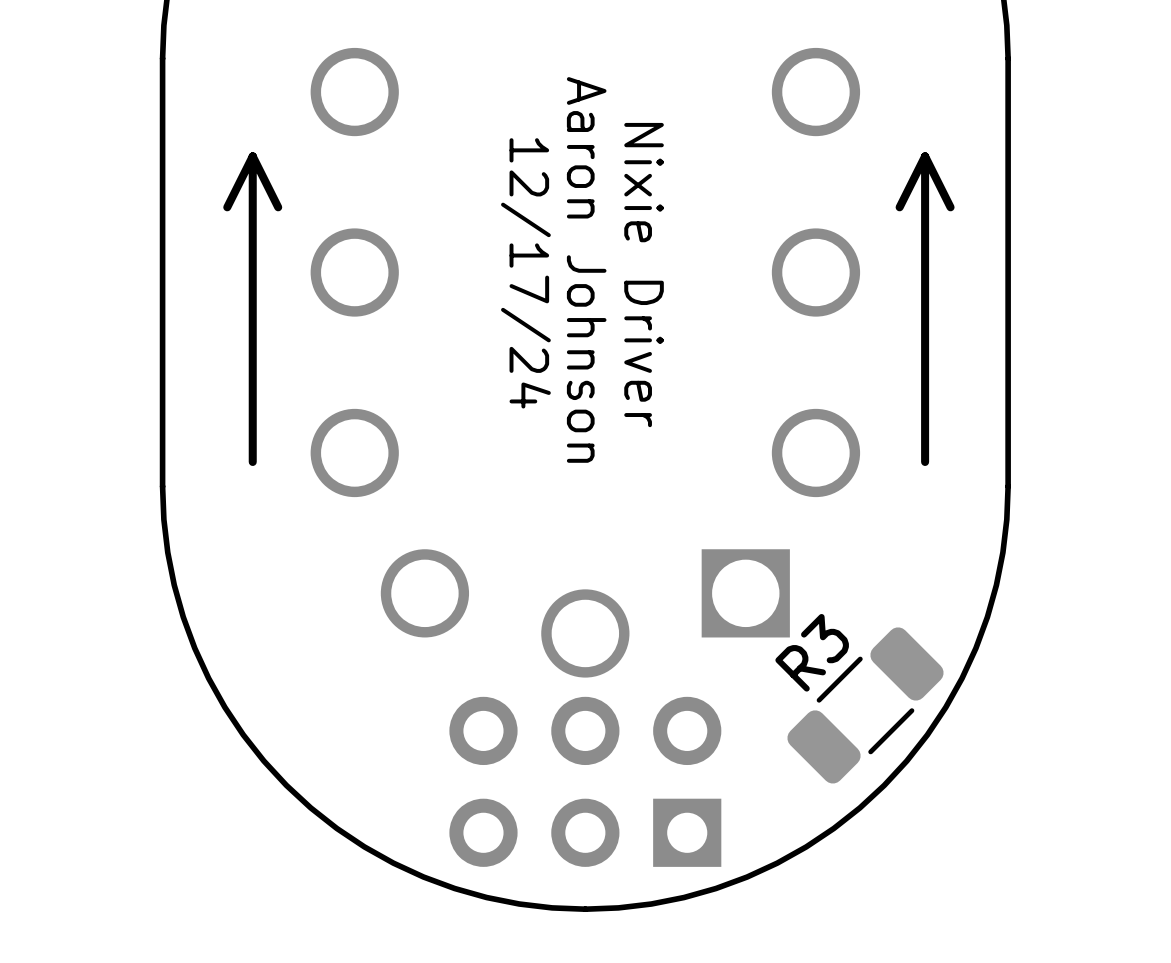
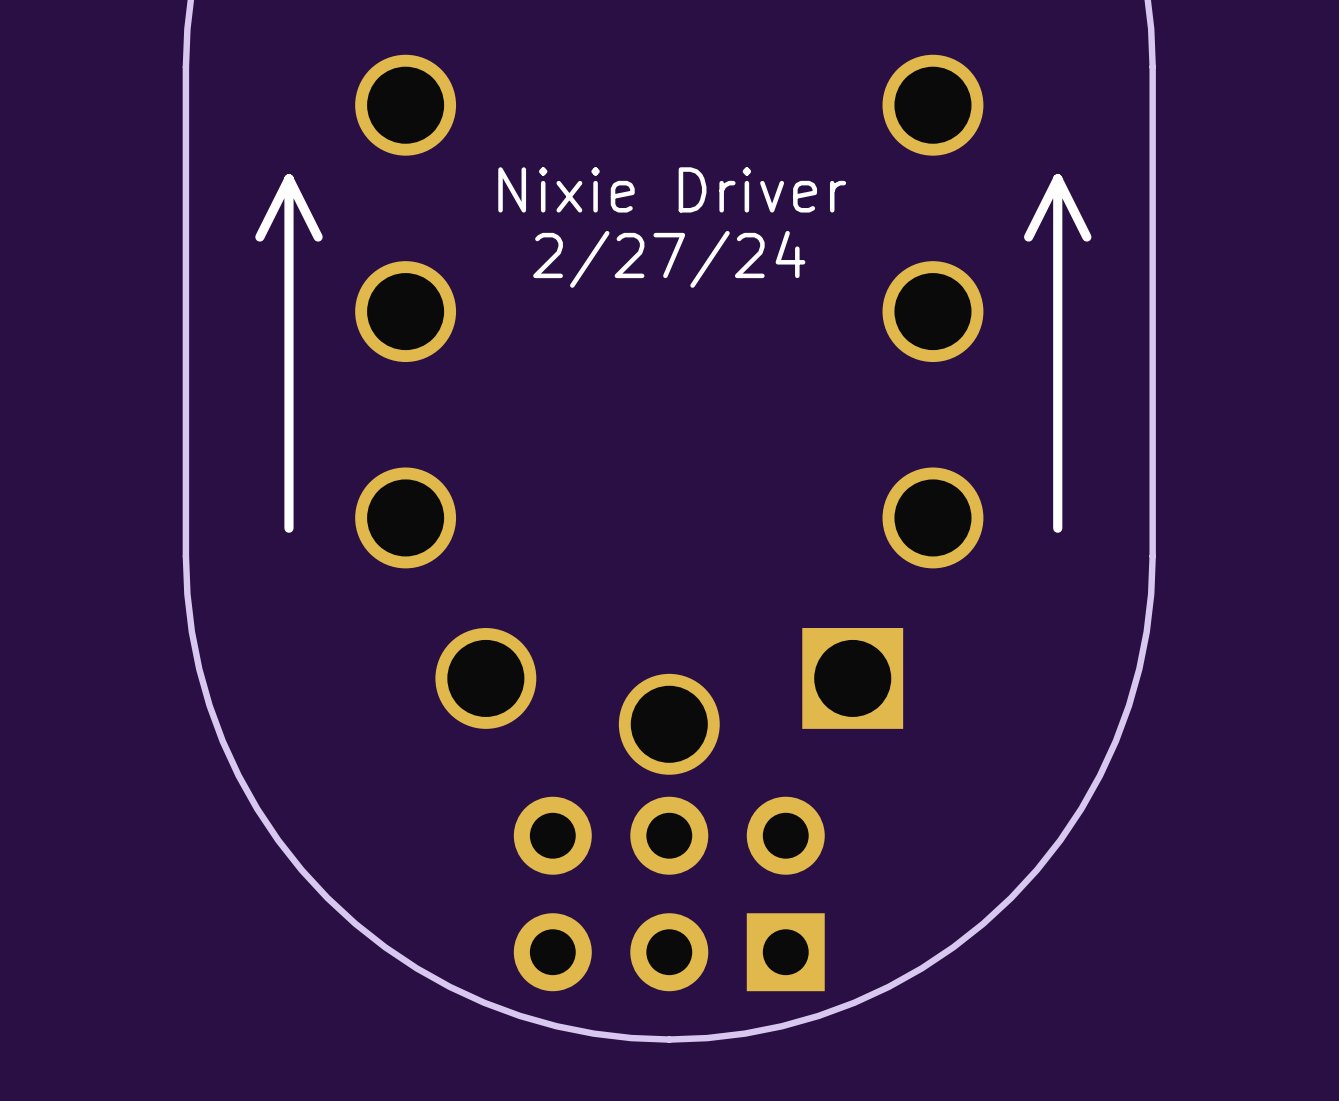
text: Aaron Johnson (586, 269) -> none
text: 12/17/24 (525, 273) -> 2/27/24 (669, 259)
text rotation: 0° (644, 275) -> 90° counterclockwise (672, 189)
R3: (865, 705) -> none

